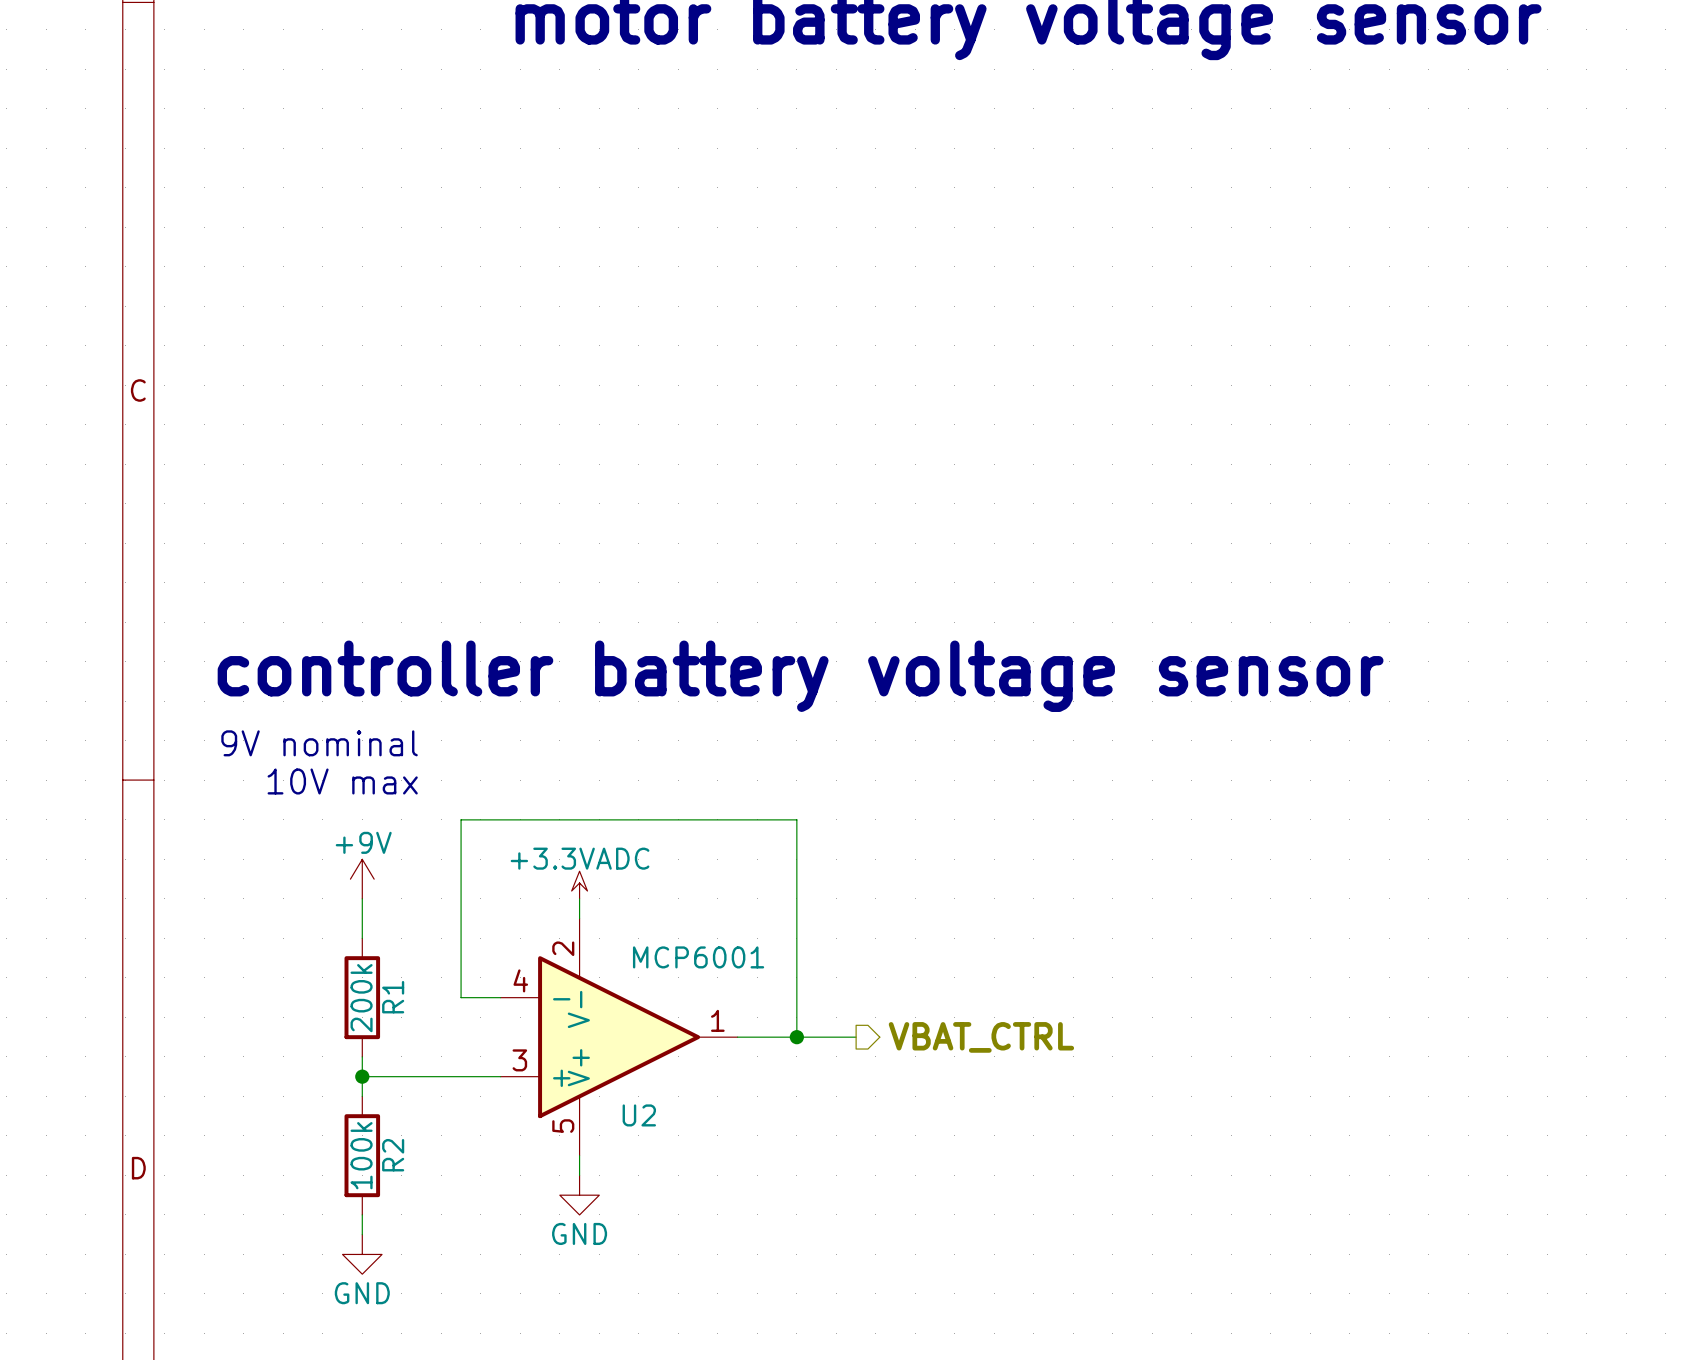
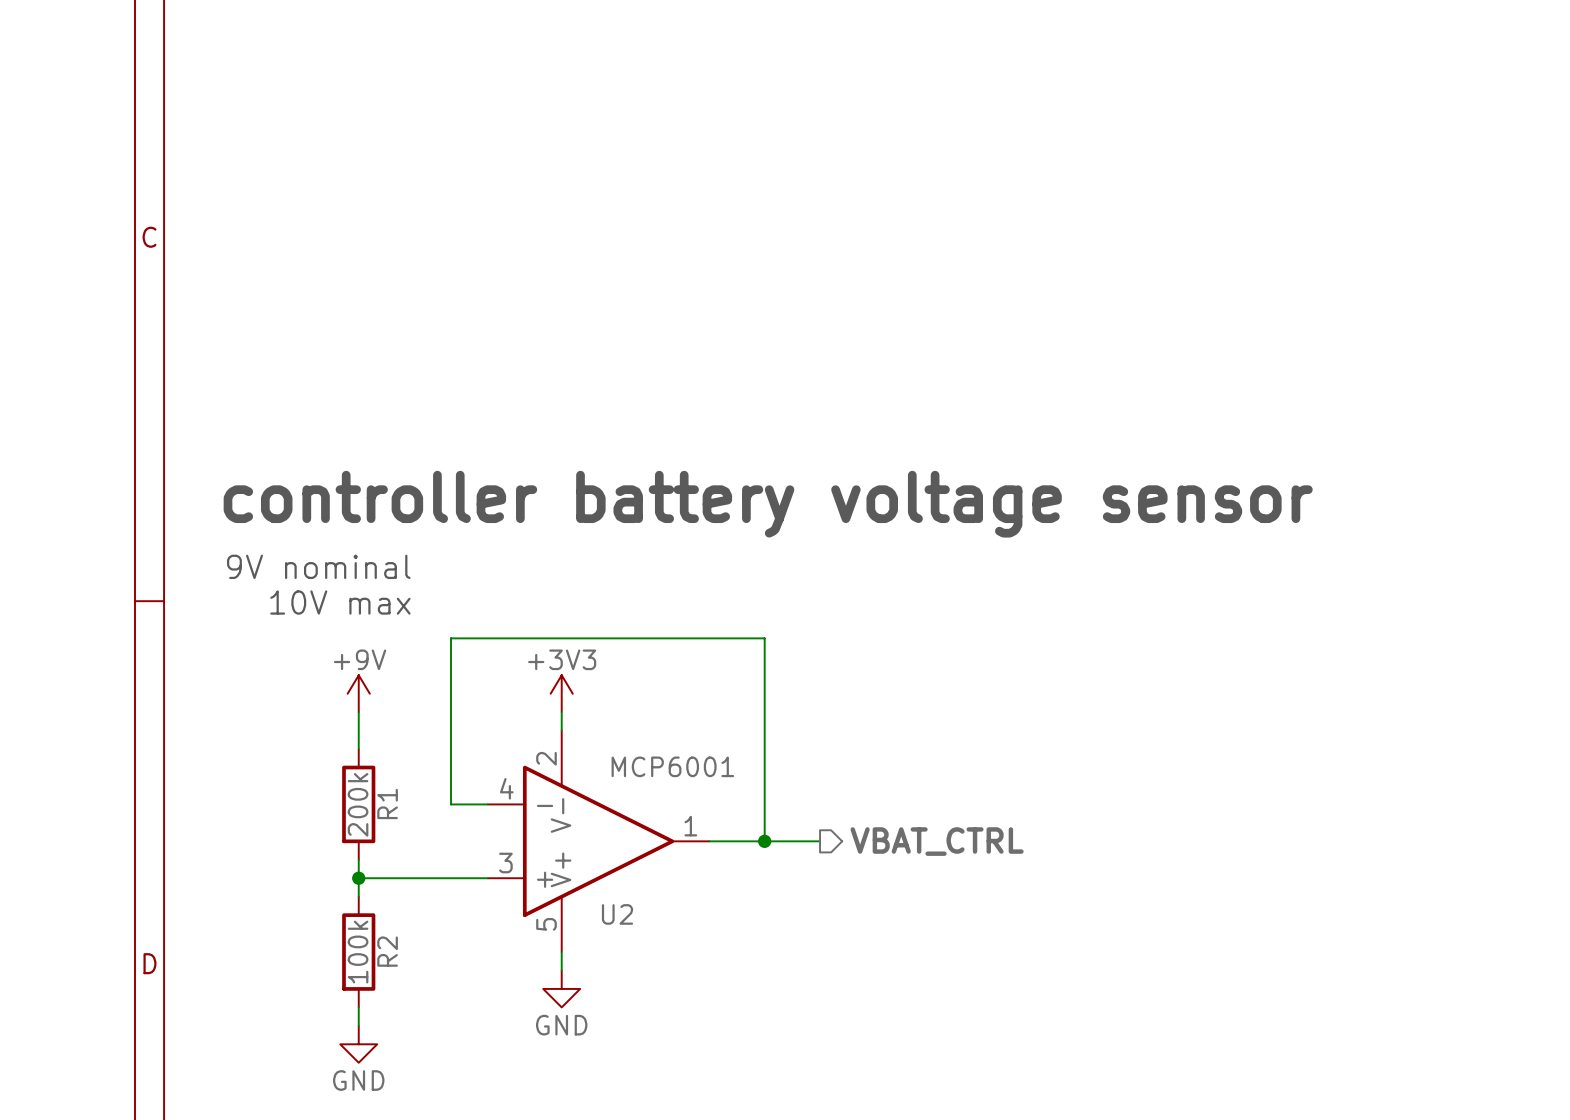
power symbol: +3.3VADC (579, 885) -> +3V3 (561, 693)

